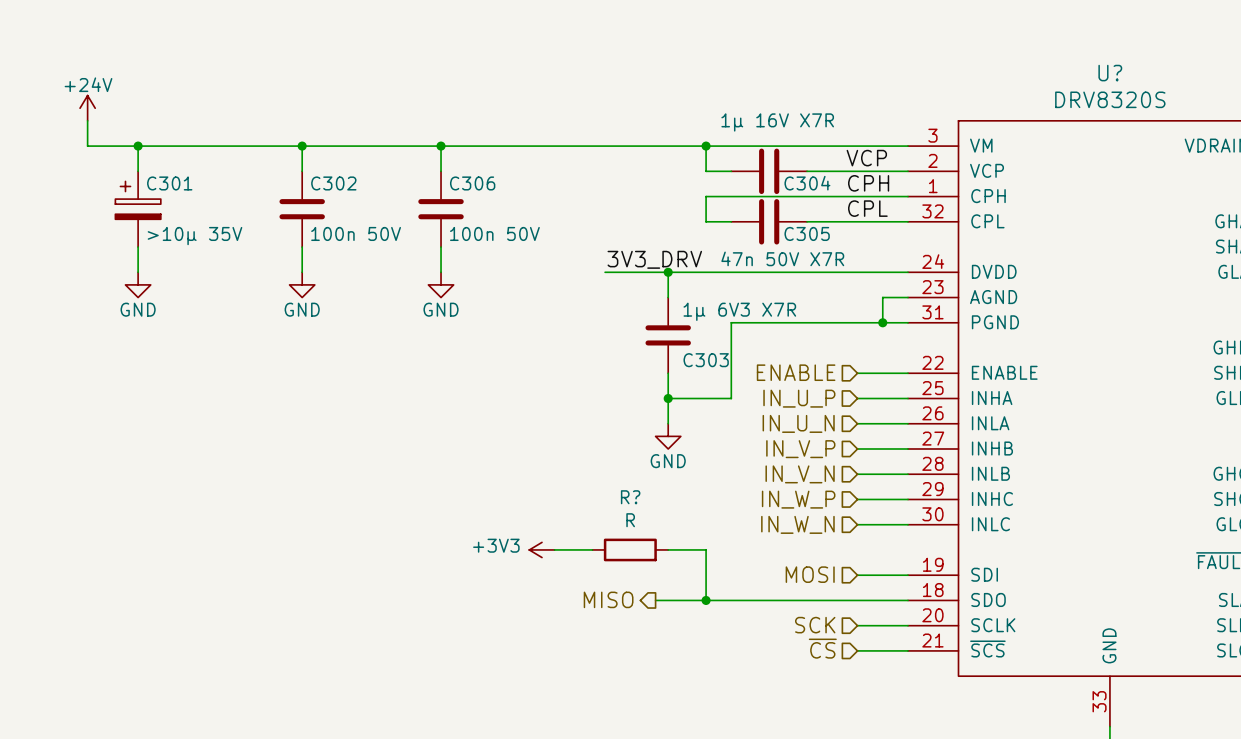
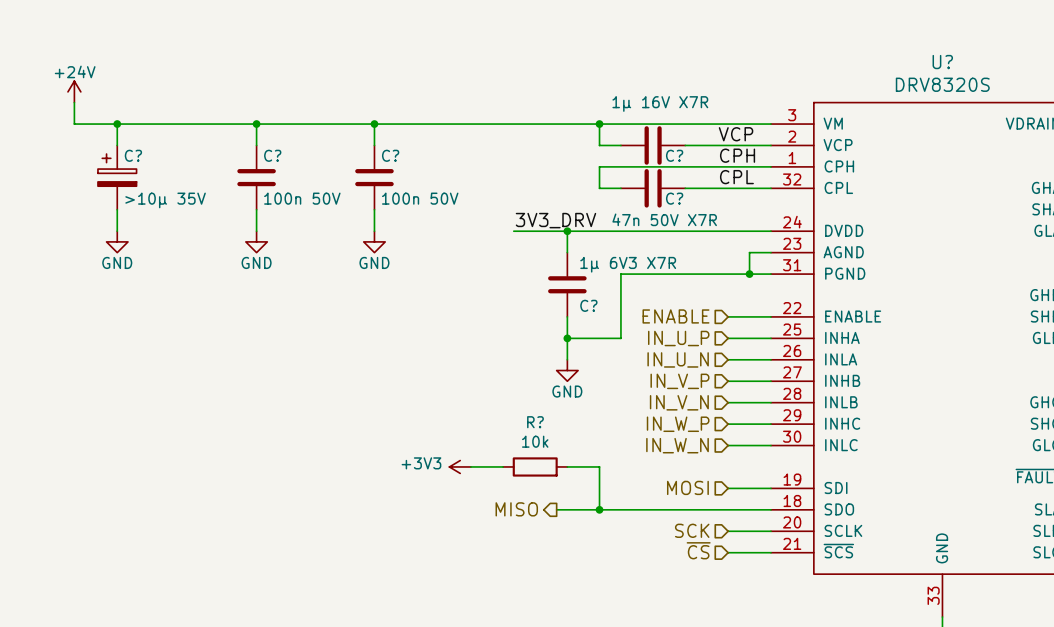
C301 name: C301 (169, 183) -> C? (133, 155)
C302 name: C302 (333, 183) -> C? (272, 155)
C306 name: C306 (472, 183) -> C? (390, 155)
C304 name: C304 (807, 183) -> C? (674, 155)
C305 name: C305 (807, 233) -> C? (674, 198)
C303 name: C303 (706, 360) -> C? (588, 305)
R? value: R (630, 520) -> 10k (535, 441)

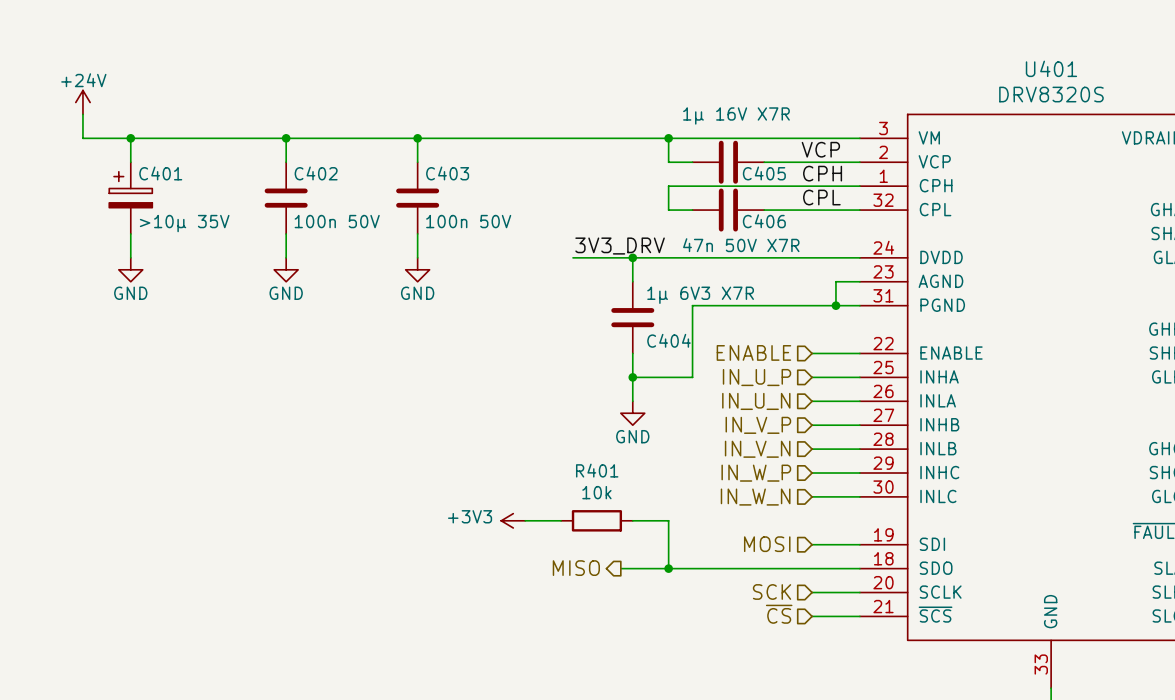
U? name: U? (942, 62) -> U401 (1051, 68)
C? name: C? (133, 155) -> C401 (160, 173)
C? name: C? (272, 155) -> C402 (316, 173)
C? name: C? (390, 155) -> C403 (447, 173)
C? name: C? (674, 155) -> C405 (764, 173)
C? name: C? (674, 198) -> C406 (764, 221)
C? name: C? (588, 305) -> C404 (669, 340)
R? name: R? (535, 422) -> R401 (597, 470)

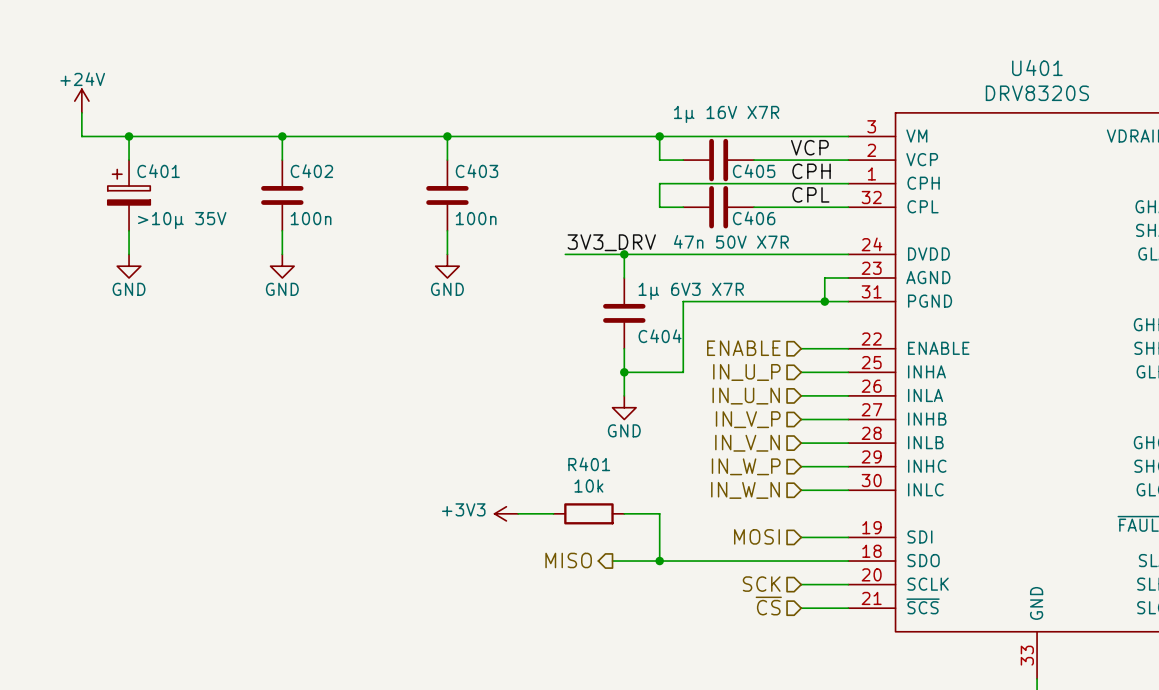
wire: (417, 138) (417, 162) -> (447, 136) (447, 160)
junction position: (417, 138) -> (447, 136)
C403 position: (417, 198) -> (447, 195)
C402 value: 100n 50V (337, 221) -> 100n (311, 218)
C403 value: 100n 50V (468, 221) -> 100n (476, 218)
wire: (417, 233) (417, 257) -> (447, 230) (447, 254)
power symbol position: GND (417, 269) -> GND (447, 266)

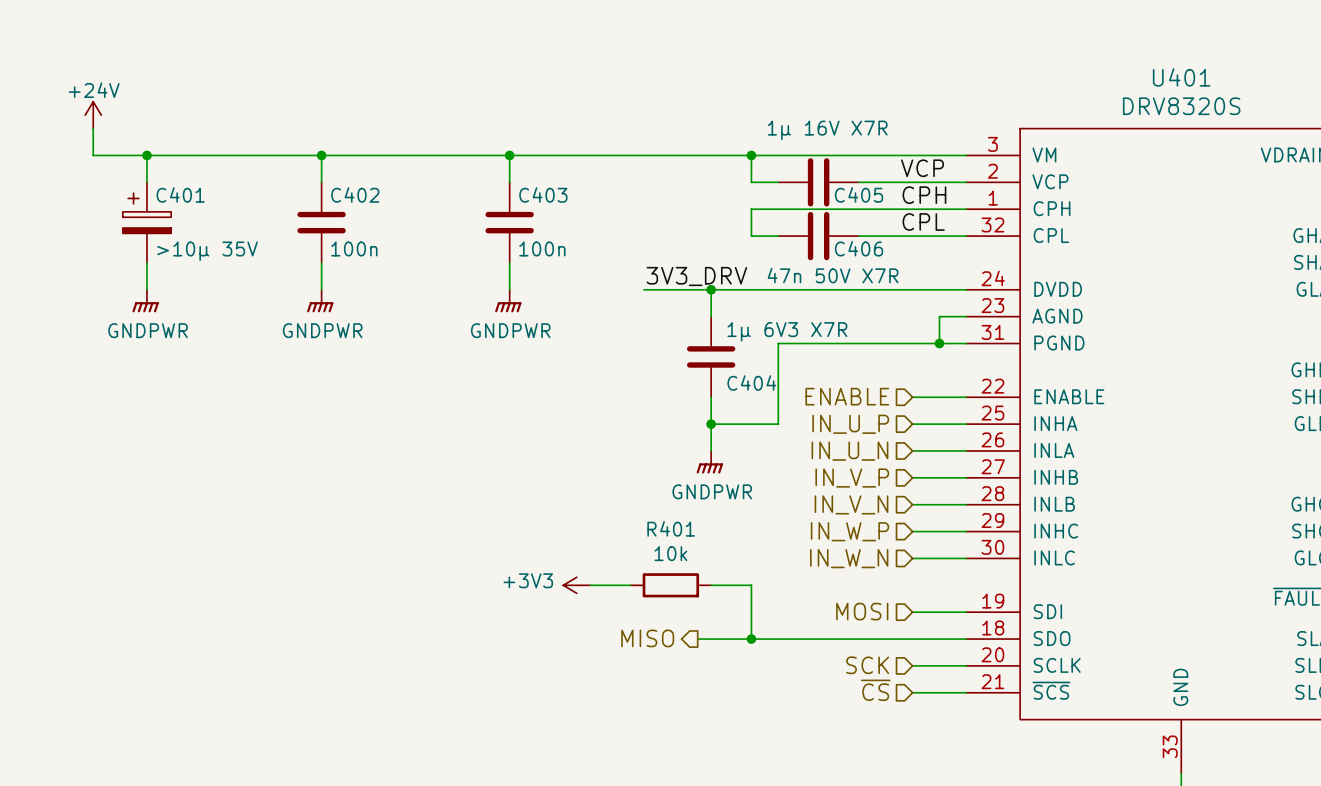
power symbol: GND (129, 266) -> GNDPWR (145, 301)
power symbol: GND (282, 266) -> GNDPWR (320, 301)
power symbol: GND (447, 266) -> GNDPWR (508, 301)
power symbol: GND (624, 407) -> GNDPWR (709, 462)

